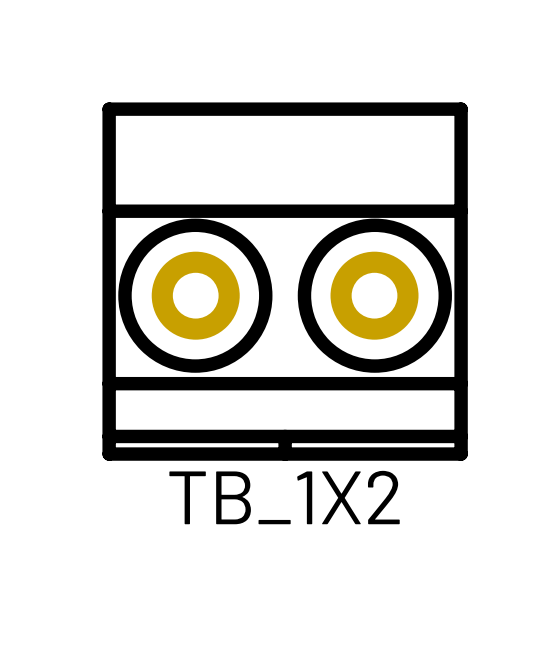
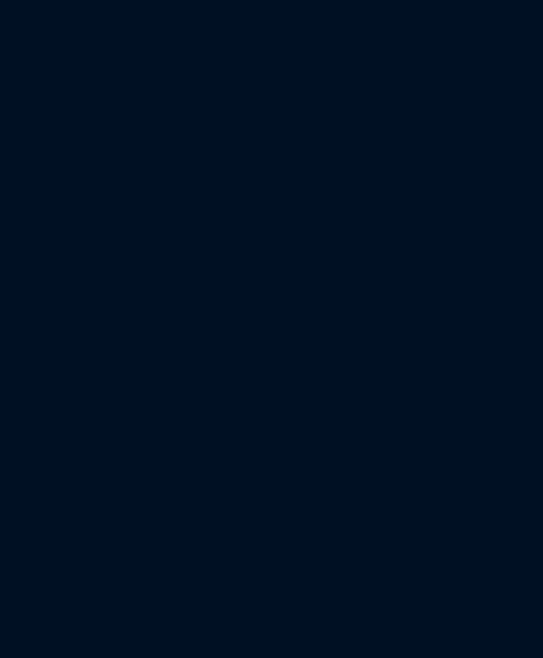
part: TB_1X2 (285, 281) -> none

